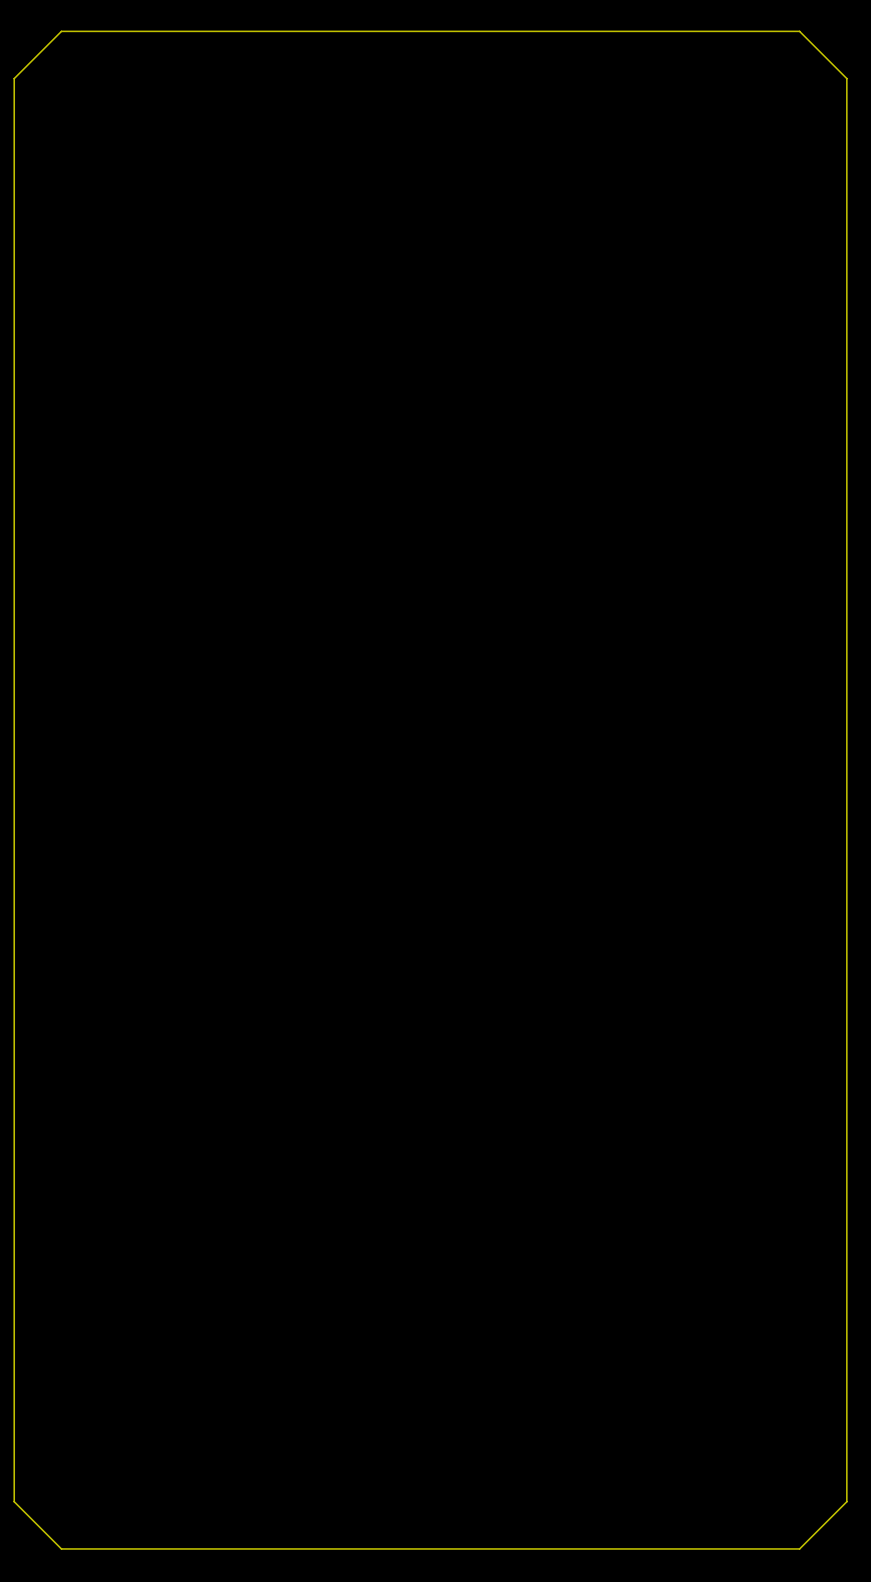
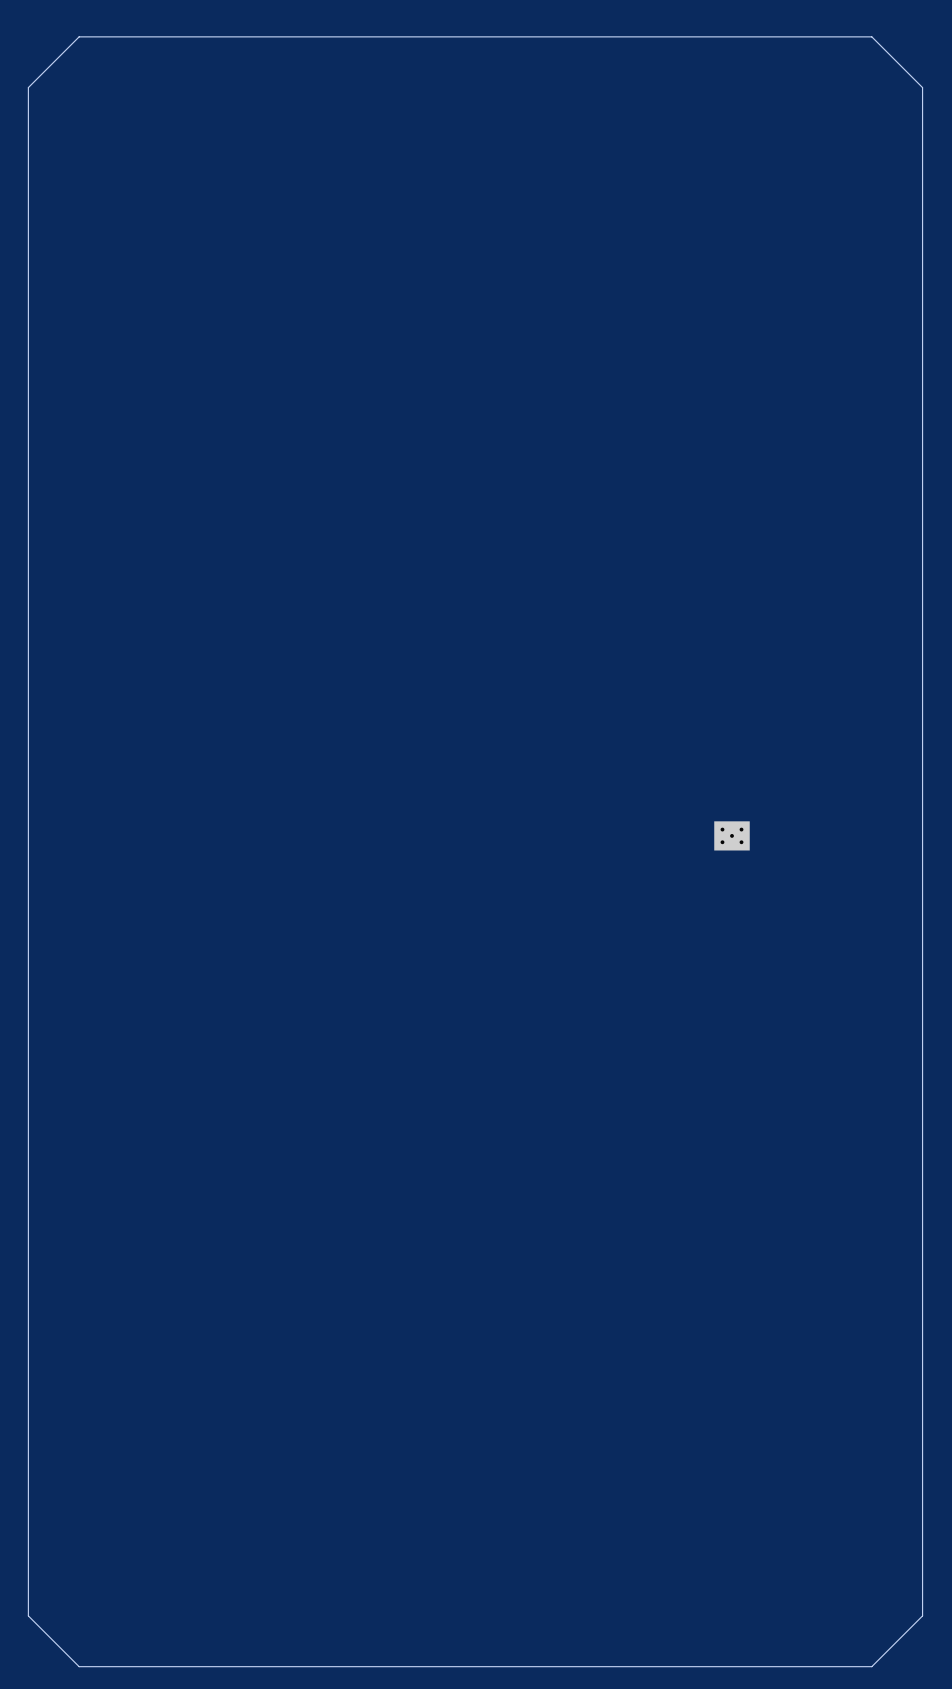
part: none -> (732, 835)

